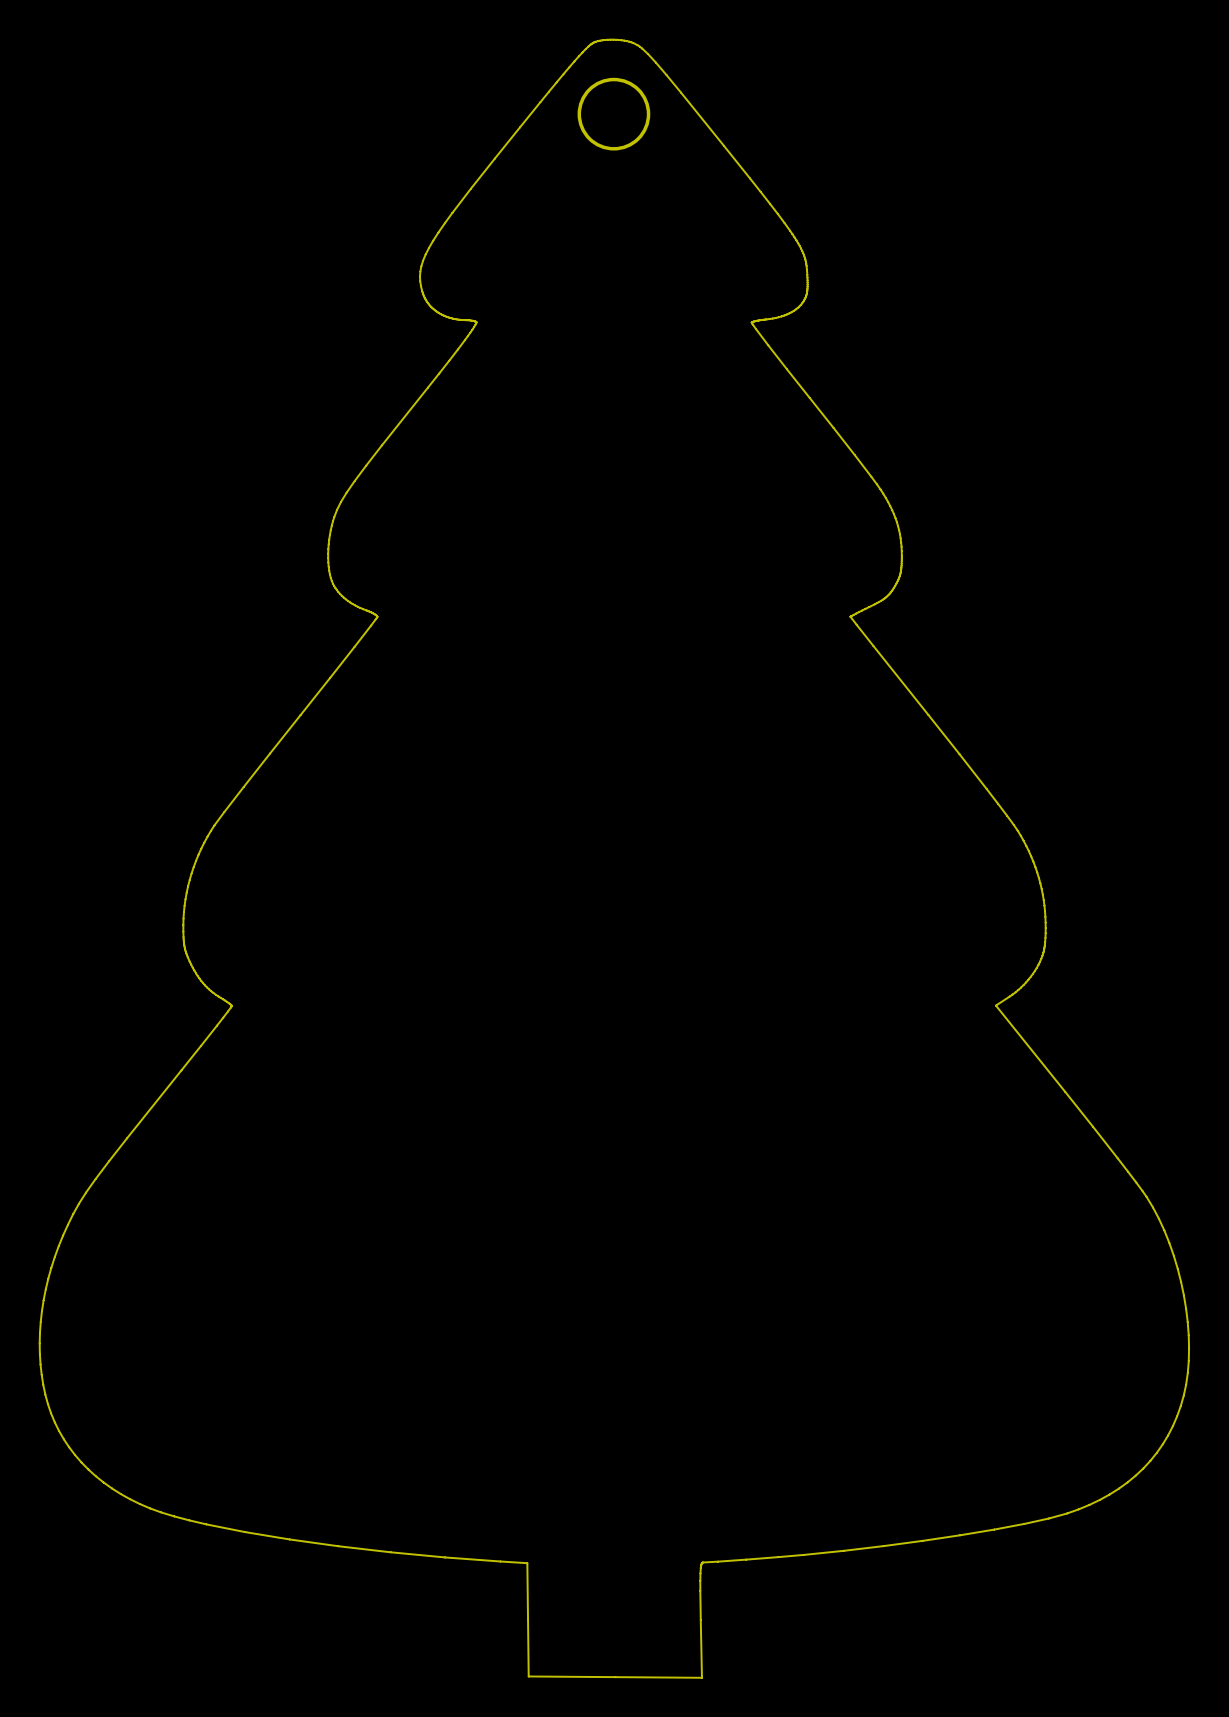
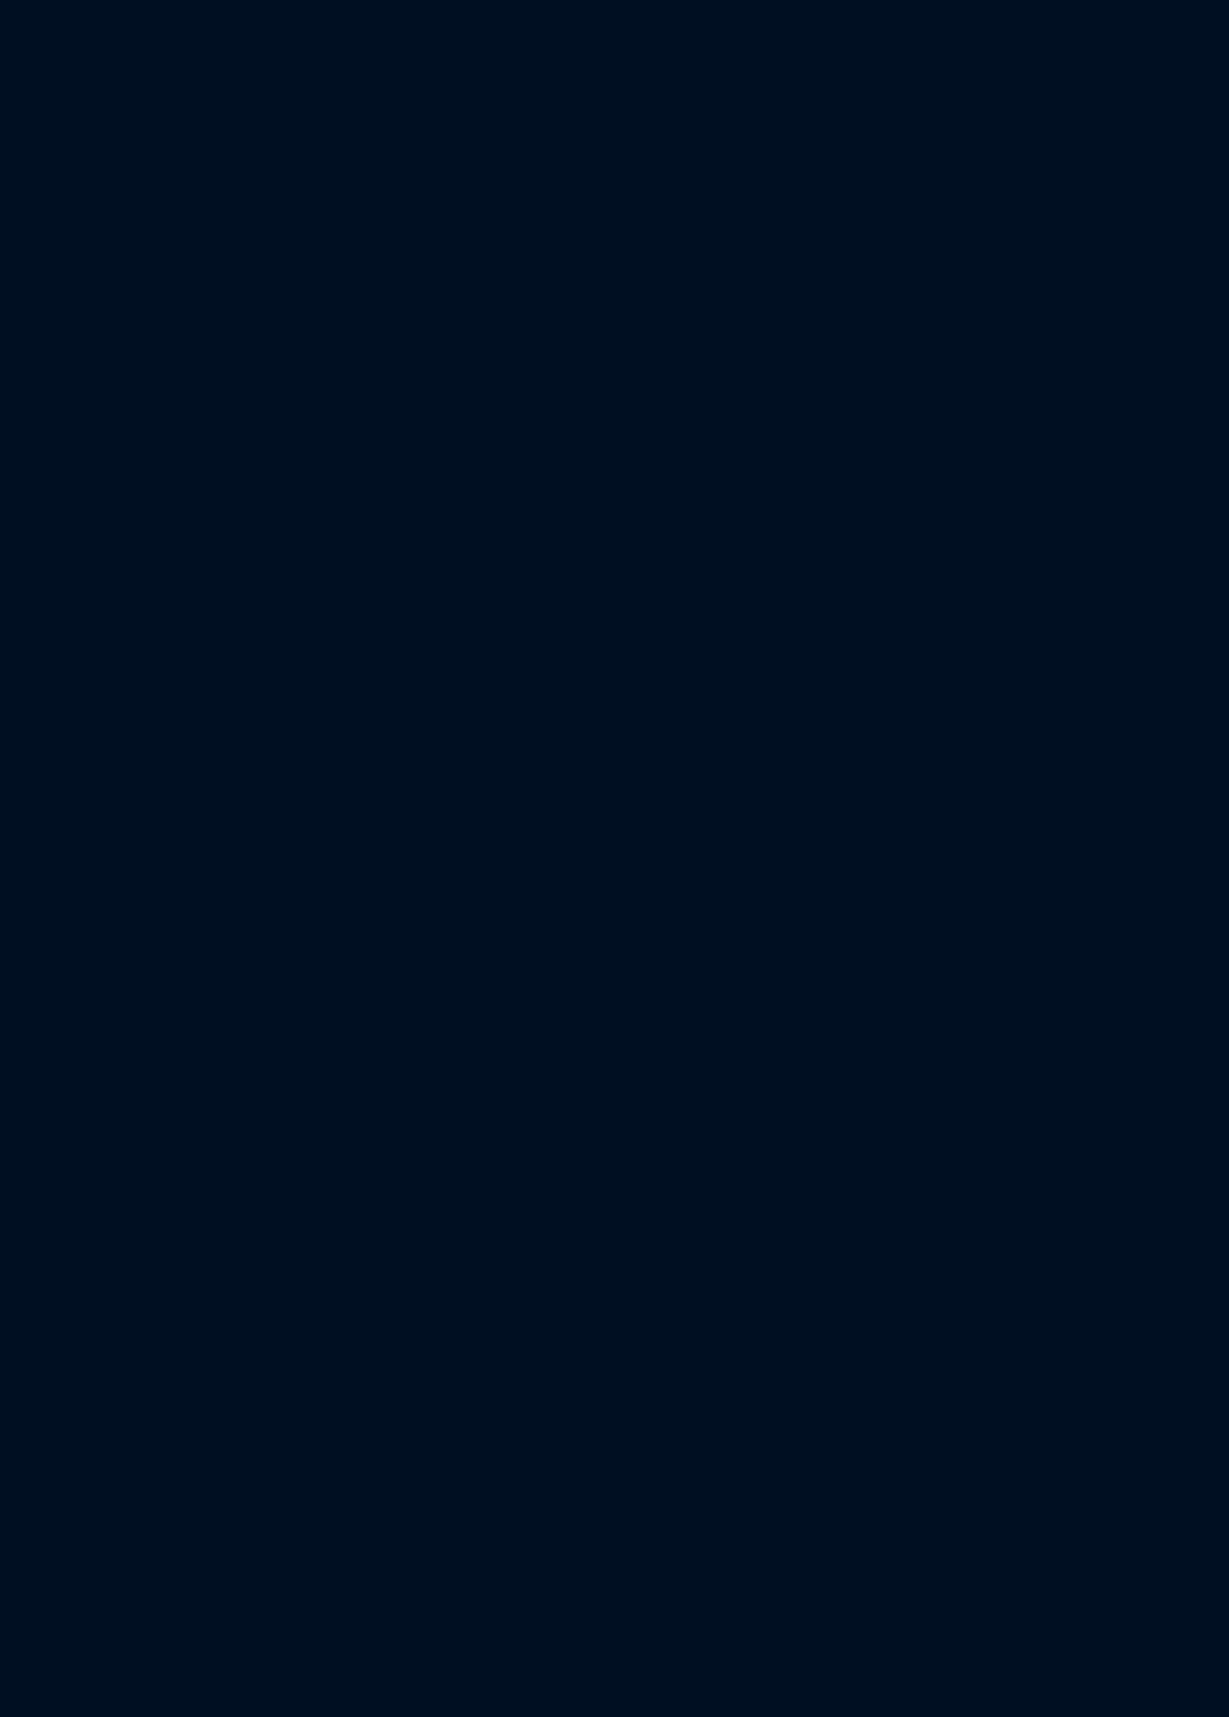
round board edge: [577, 77, 651, 151] -> none
board edge: (476, 322) (457, 349) (354, 480) (340, 501) (334, 517) (328, 549) (328, 566) (331, 581) (336, 590) (345, 599) (377, 616) -> none
board edge: (751, 322) (876, 484) (888, 502) (896, 522) (901, 555) (900, 571) (897, 581) (884, 598) (850, 616) -> none
board edge: (752, 322) (786, 314) (797, 308) (803, 301) (807, 291) (807, 277) (805, 261) (801, 248) (769, 203) (655, 62) (637, 45) (626, 41) (613, 39) (593, 42) (574, 61) (470, 188) (438, 232) (425, 254) (421, 266) (420, 281) (423, 294) (428, 303) (445, 316) (476, 322) -> none
board edge: (377, 616) (224, 812) (207, 836) (196, 860) (184, 905) (183, 931) (185, 949) (192, 967) (203, 983) (231, 1005) -> none
board edge: (850, 616) (997, 803) (1026, 845) (1035, 867) (1042, 894) (1045, 922) (1044, 949) (1038, 964) (1028, 979) (1015, 992) (995, 1005) (1146, 1196) (1164, 1230) (1177, 1268) (1186, 1308) (1189, 1348) (1186, 1384) (1180, 1406) (1172, 1426) (1156, 1452) (1135, 1475) (1109, 1494) (1067, 1513) (994, 1529) (843, 1550) (702, 1562) (700, 1580) (701, 1677) (528, 1676) (527, 1563) (390, 1552) (289, 1539) (189, 1520) (161, 1512) (130, 1499) (103, 1482) (81, 1462) (63, 1439) (51, 1413) (43, 1384) (39, 1354) (40, 1322) (45, 1289) (63, 1235) (86, 1192) (231, 1006) -> none

